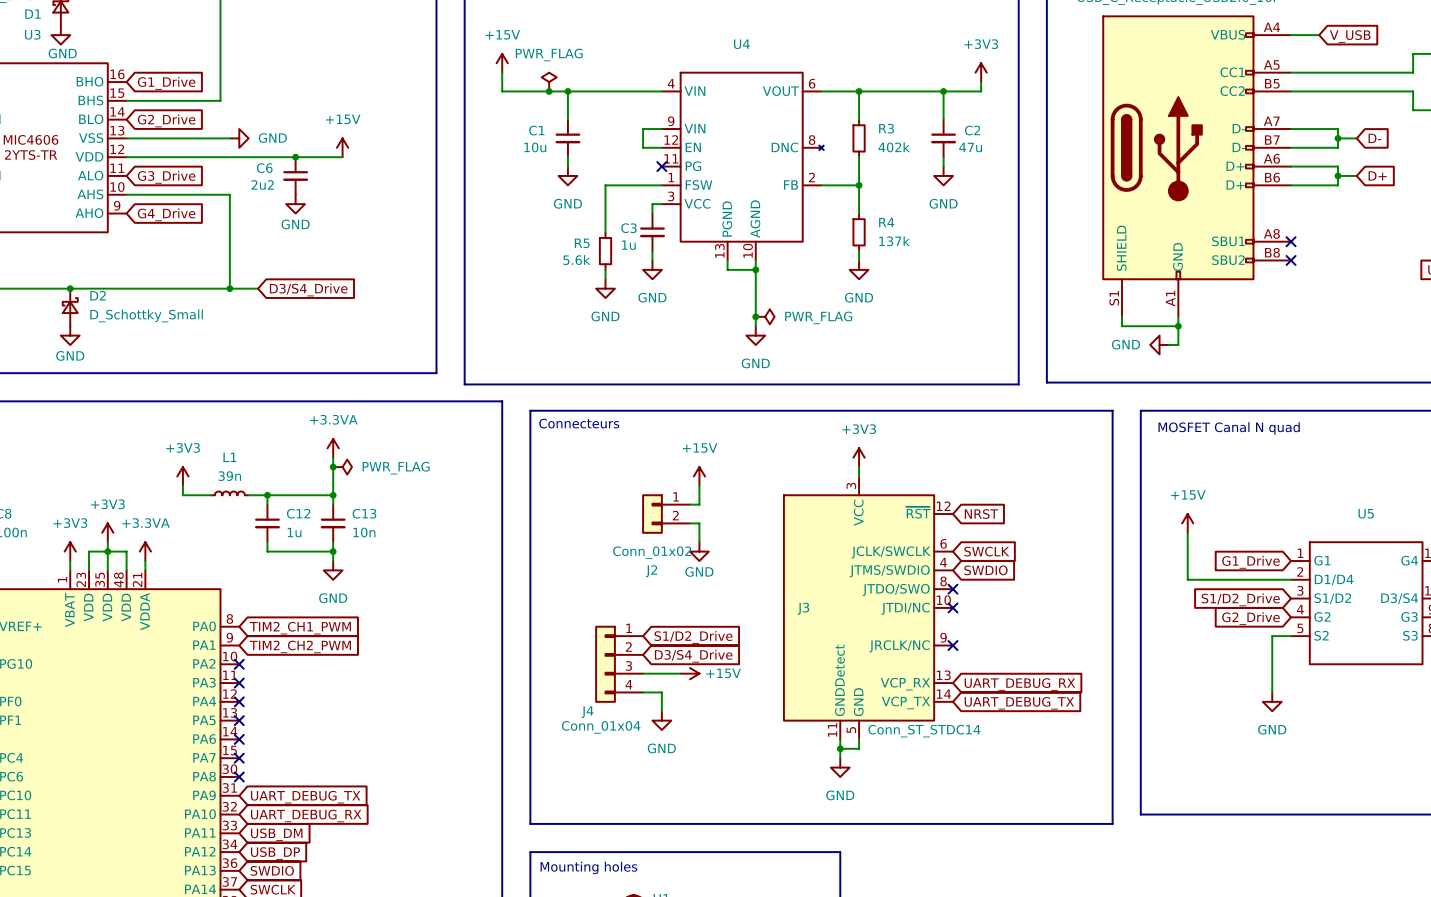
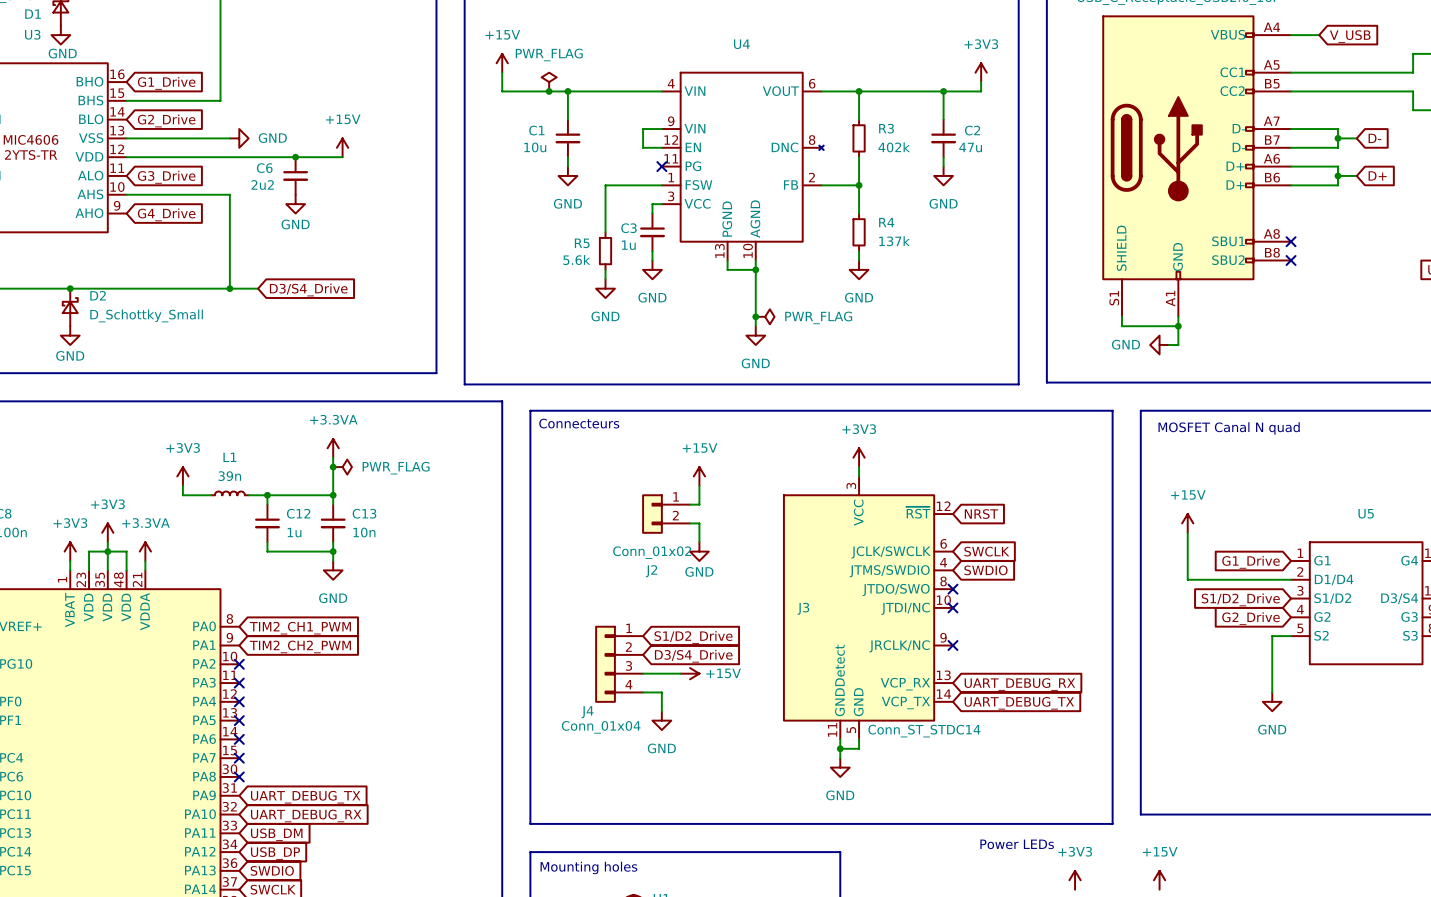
text: none -> Power LEDs (1017, 844)
power symbol: none -> +3V3 (1075, 880)
power symbol: none -> +15V (1159, 880)

